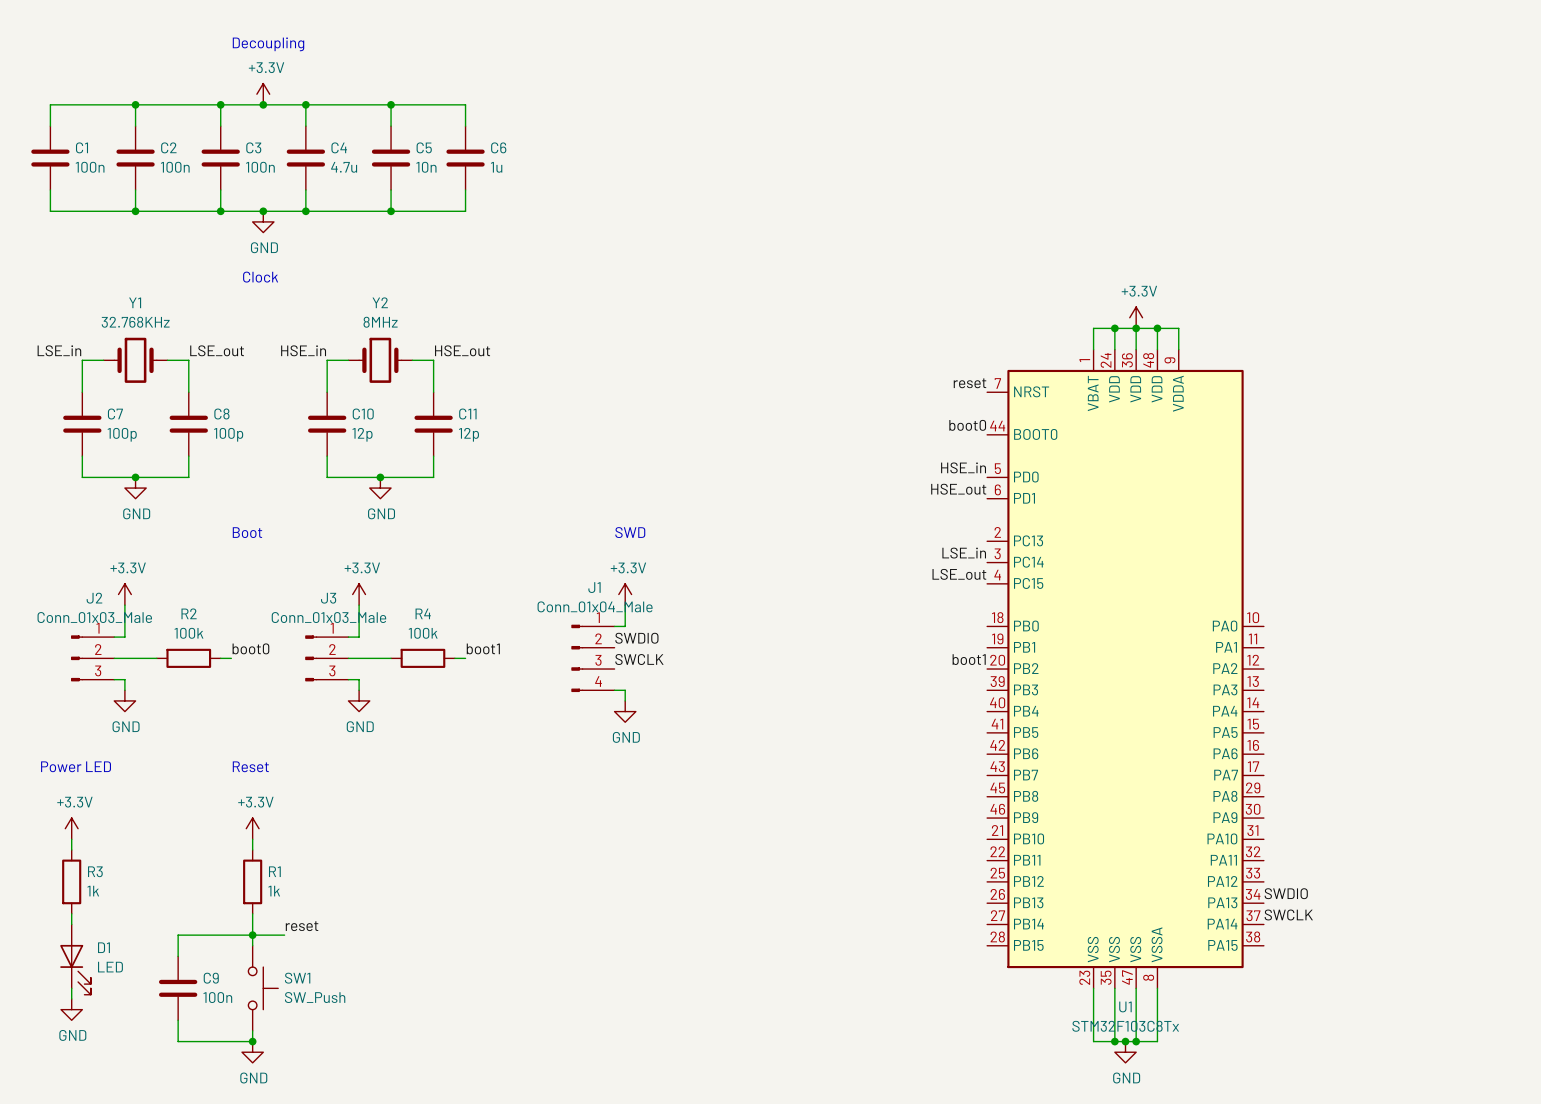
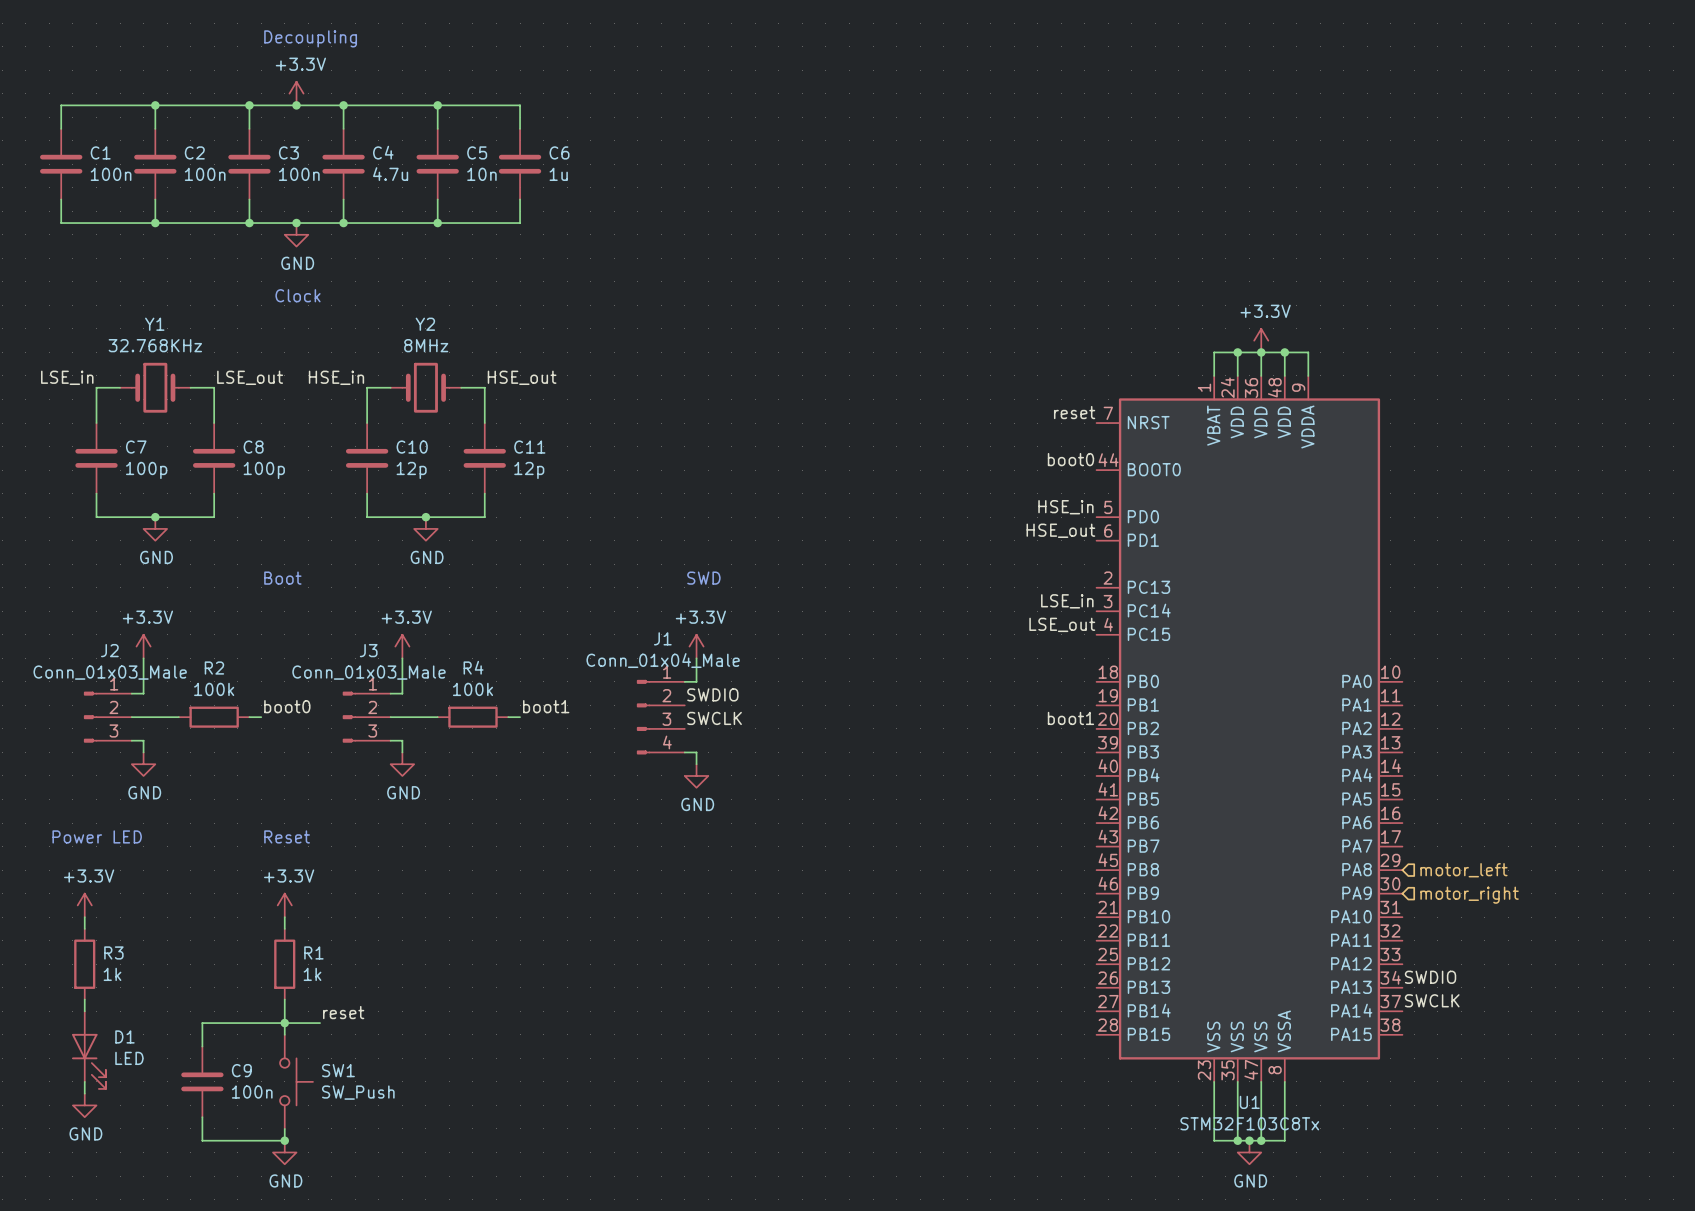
hierarchical label: none -> motor_left (1463, 870)
hierarchical label: none -> motor_right (1469, 895)

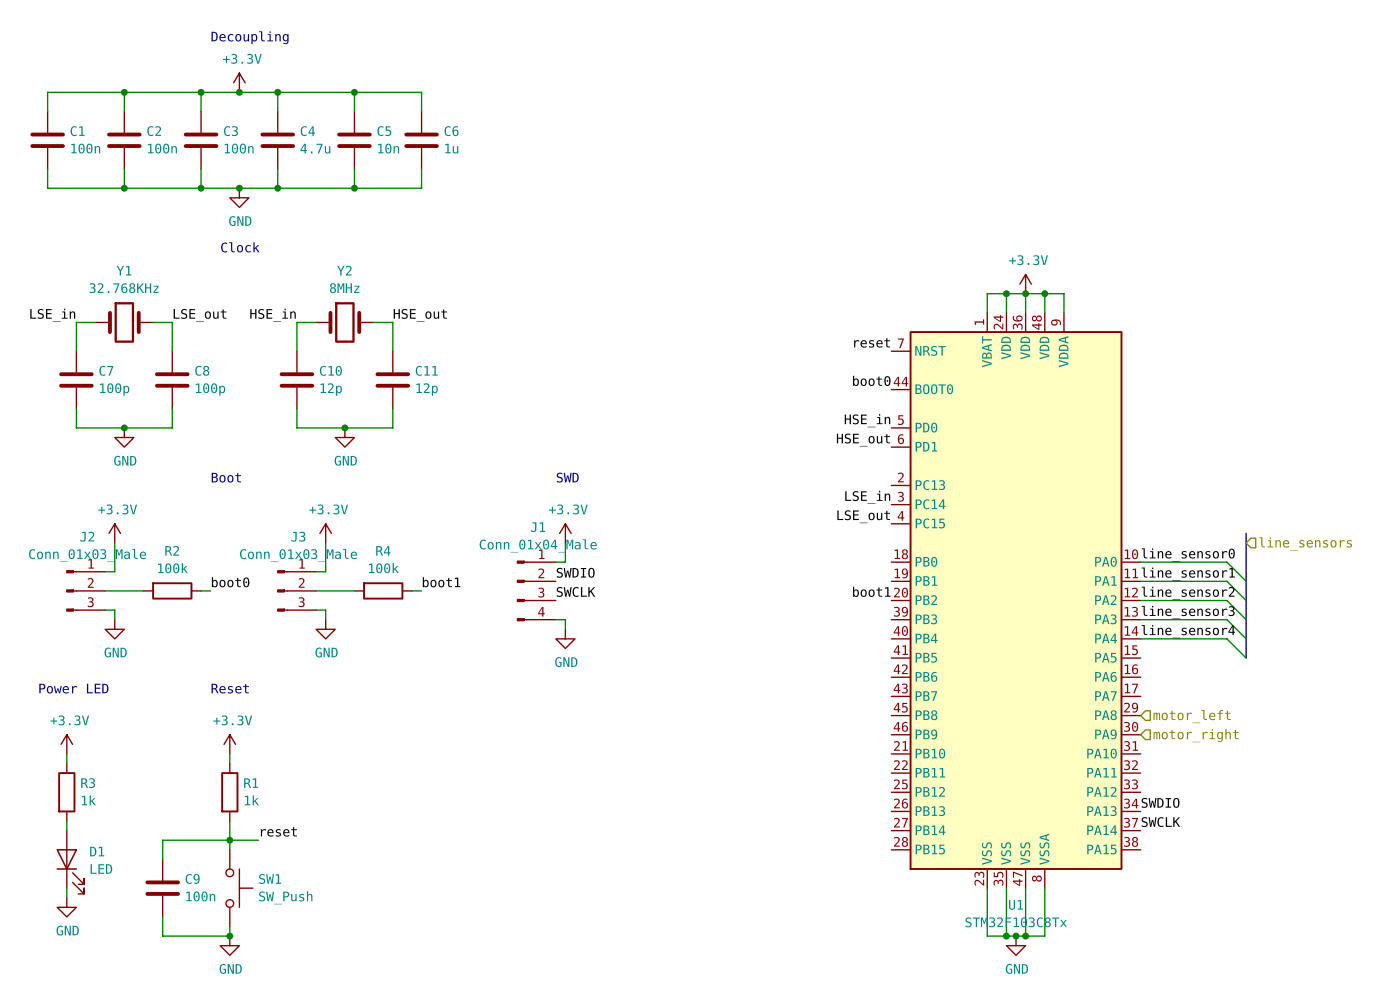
bus: none -> (1246, 533) (1246, 658)
hierarchical label: none -> line_sensors (1305, 543)
label: none -> line_sensor0 (1188, 554)
wire: none -> (1140, 562) (1226, 562) (1246, 581)
label: none -> line_sensor1 (1188, 574)
wire: none -> (1140, 581) (1226, 581) (1246, 600)
label: none -> line_sensor2 (1188, 593)
wire: none -> (1140, 600) (1226, 600) (1246, 619)
label: none -> line_sensor3 (1188, 612)
wire: none -> (1140, 619) (1226, 619) (1246, 638)
label: none -> line_sensor4 (1188, 631)
wire: none -> (1140, 638) (1226, 638) (1246, 658)

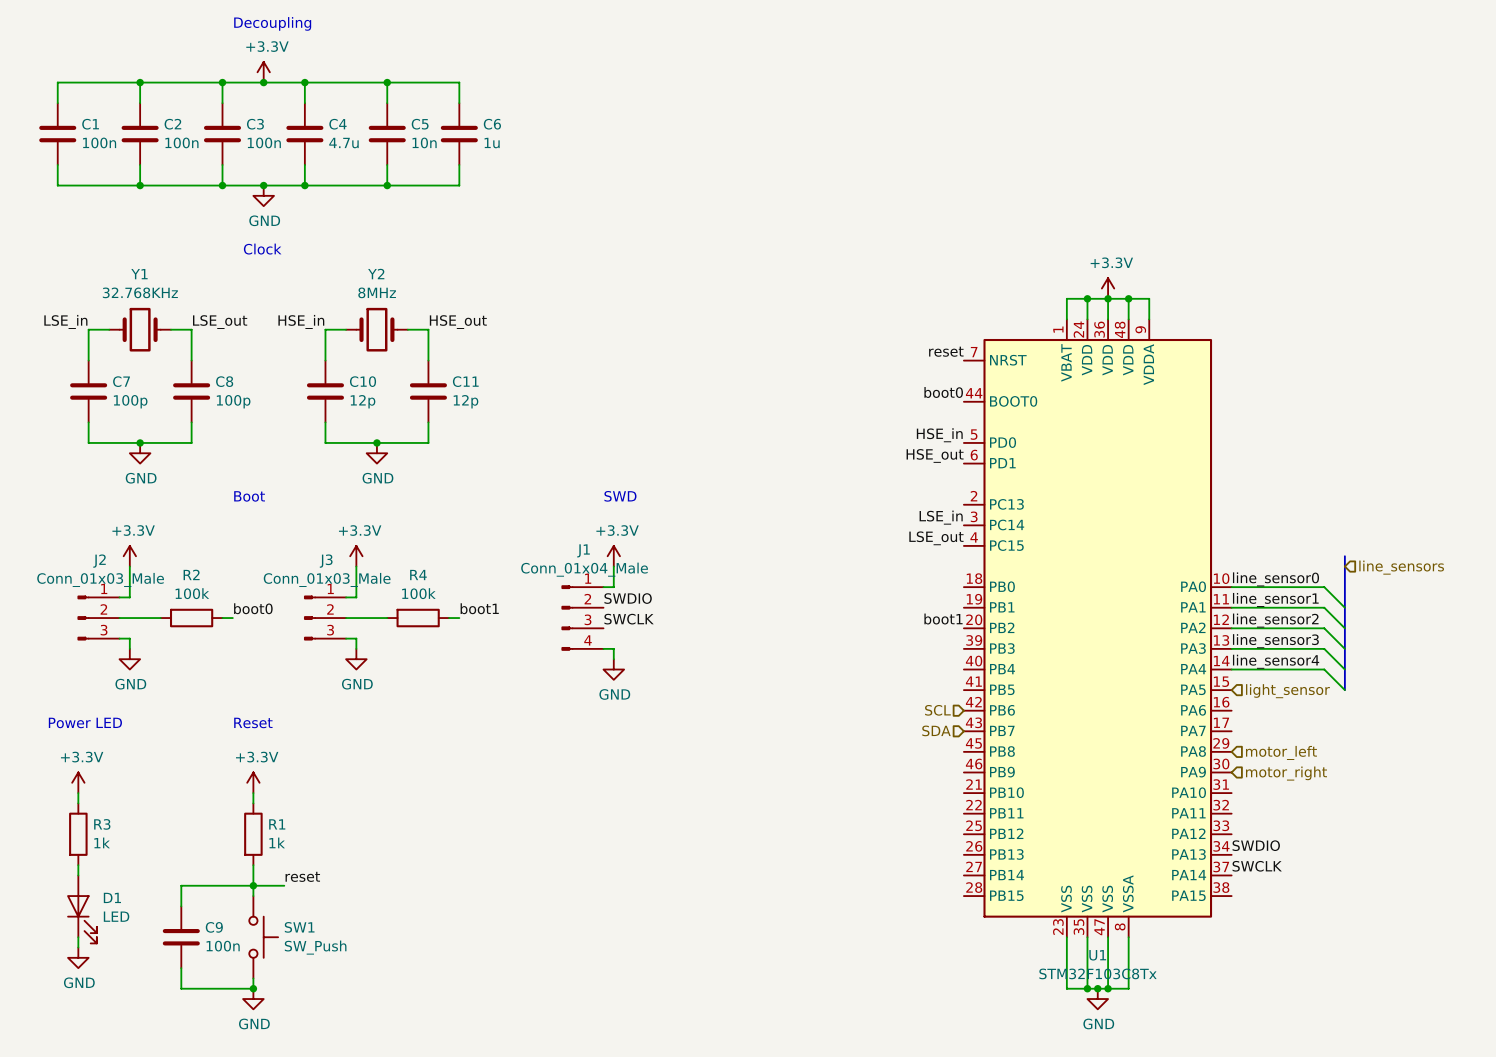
hierarchical label: none -> light_sensor (1287, 691)
hierarchical label: none -> SCL (937, 710)
hierarchical label: none -> SDA (936, 730)

